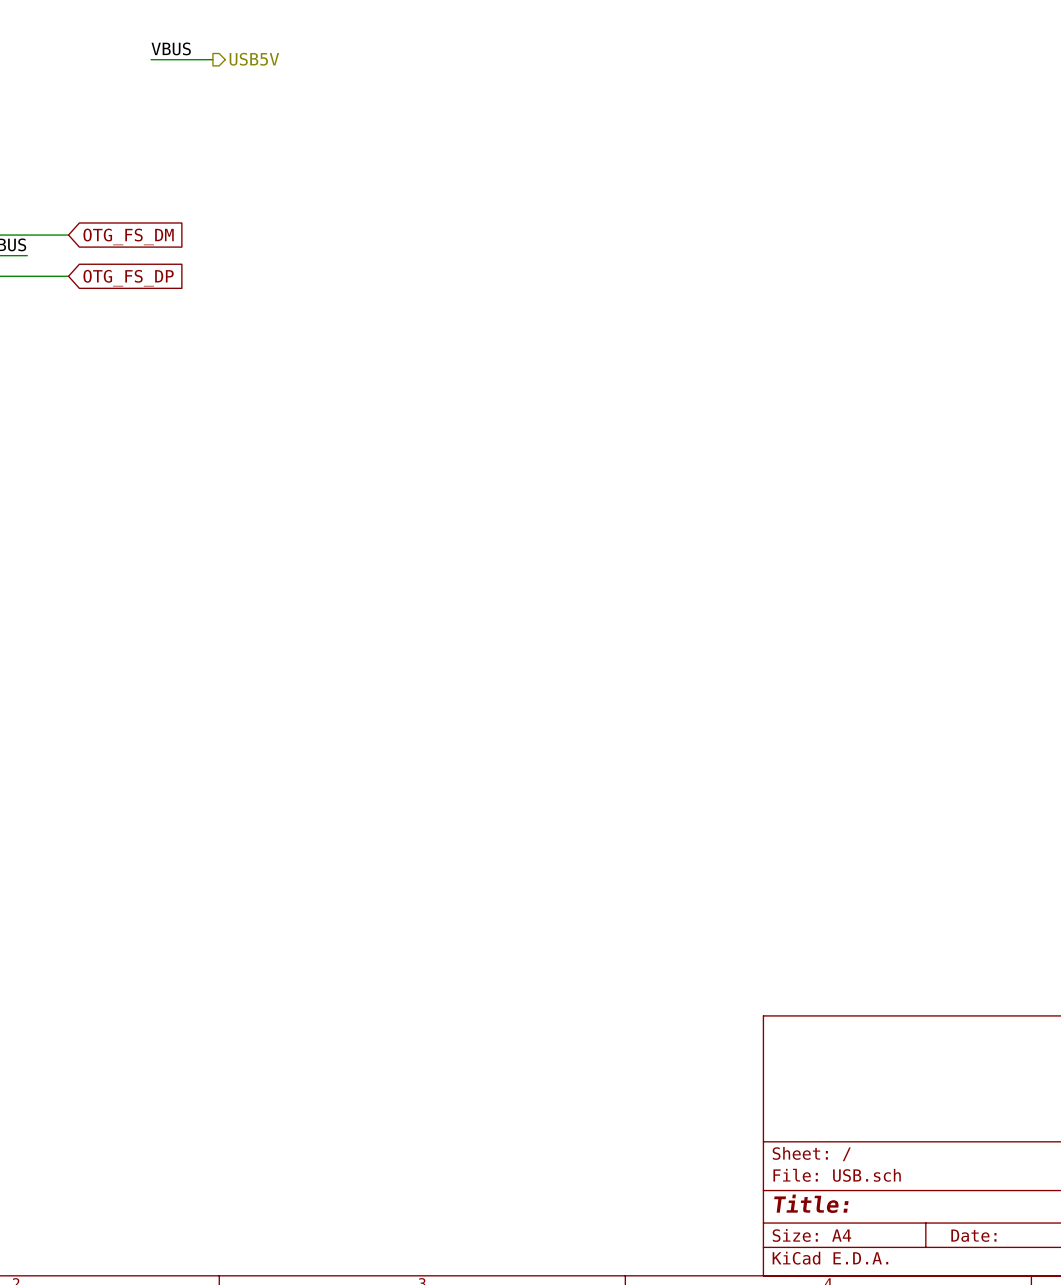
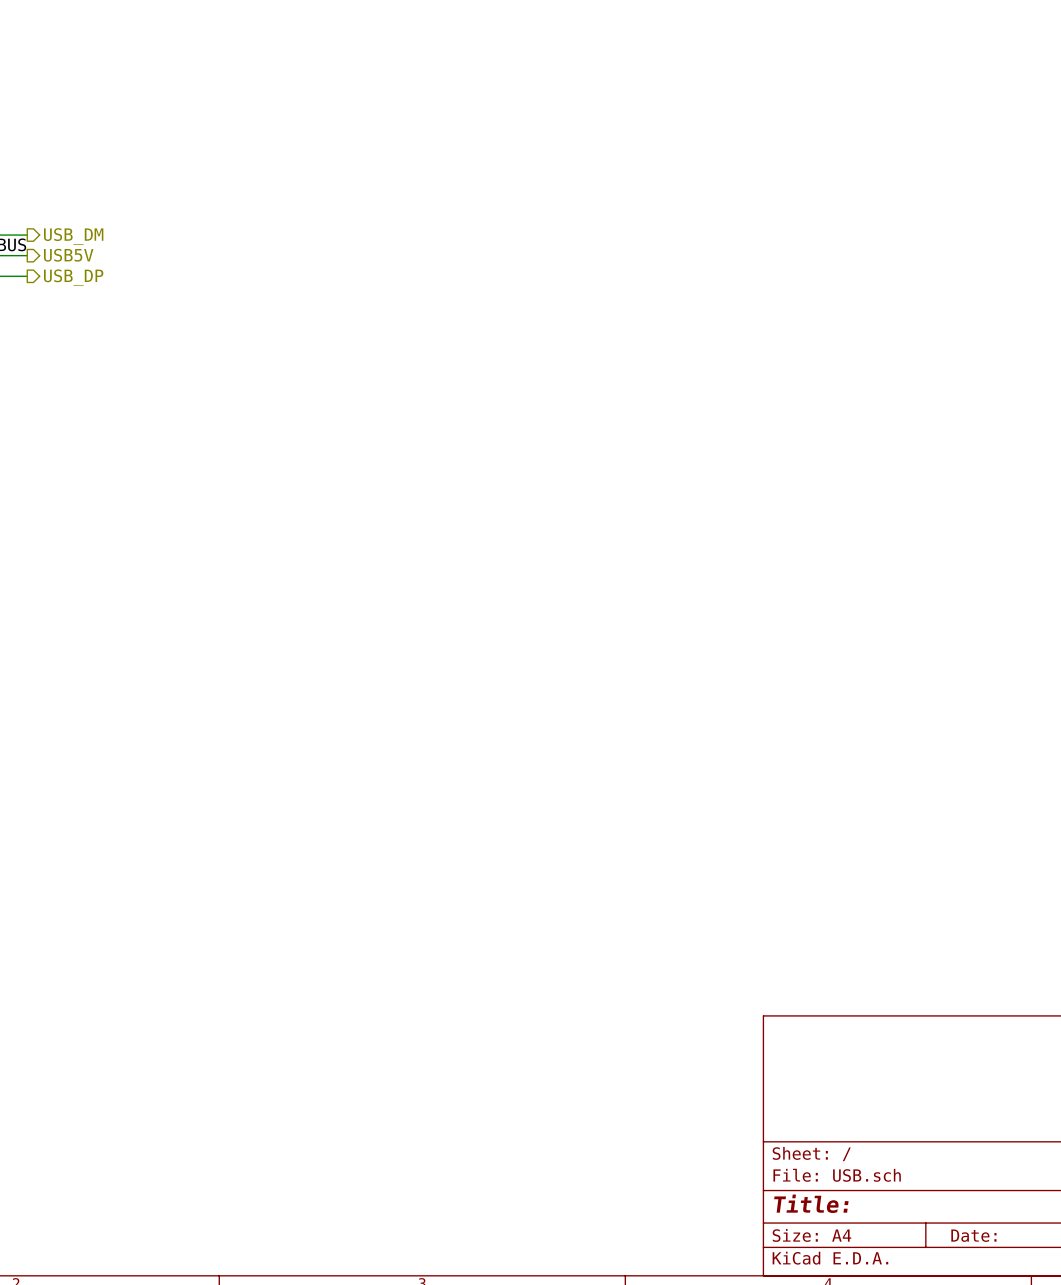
label: VBUS (171, 48) -> none
wire: (151, 59) (212, 59) -> none
hierarchical label: USB5V (254, 59) -> none
wire: (27, 235) (68, 235) -> none
hierarchical label: none -> USB_DM (73, 236)
global label: OTG_FS_DM (128, 236) -> none
hierarchical label: none -> USB5V (68, 255)
wire: (27, 276) (68, 276) -> none
hierarchical label: none -> USB_DP (73, 277)
global label: OTG_FS_DP (128, 278) -> none

